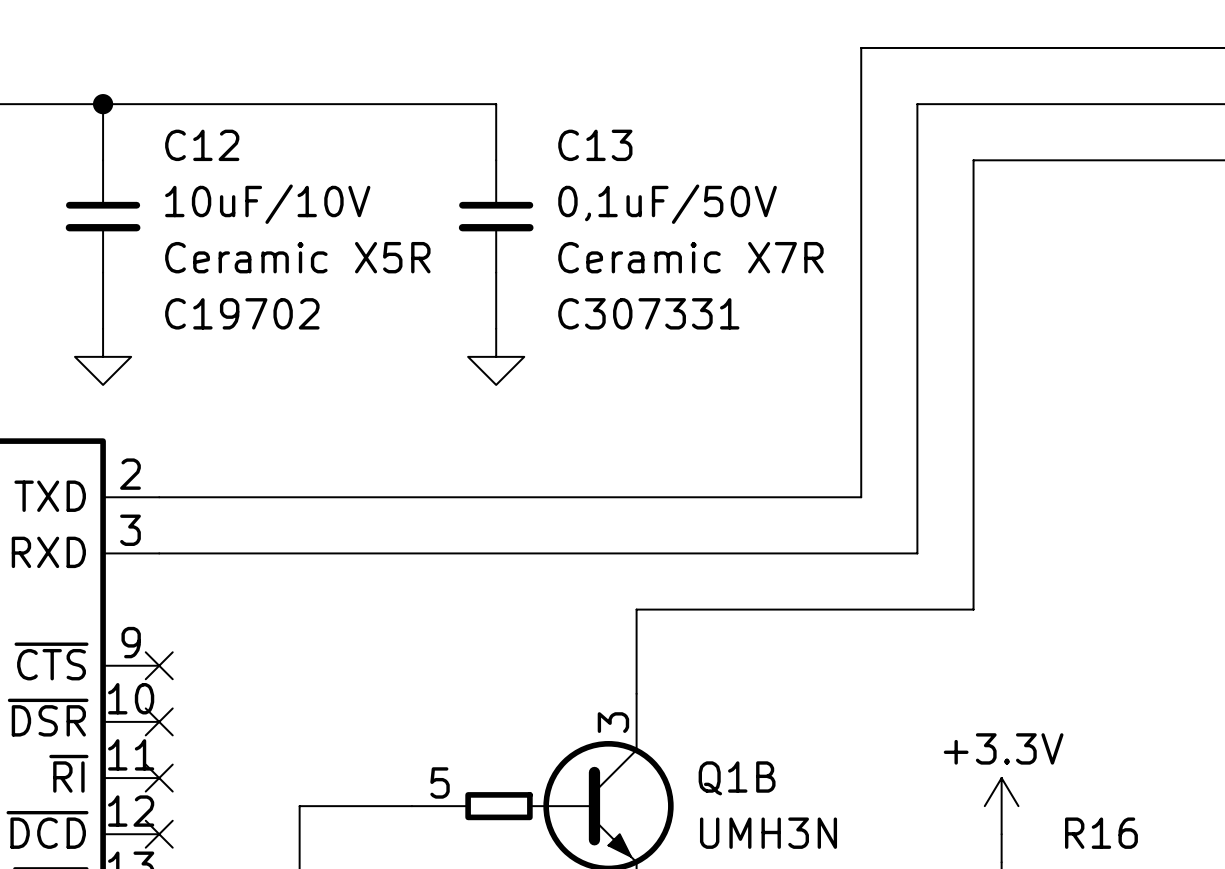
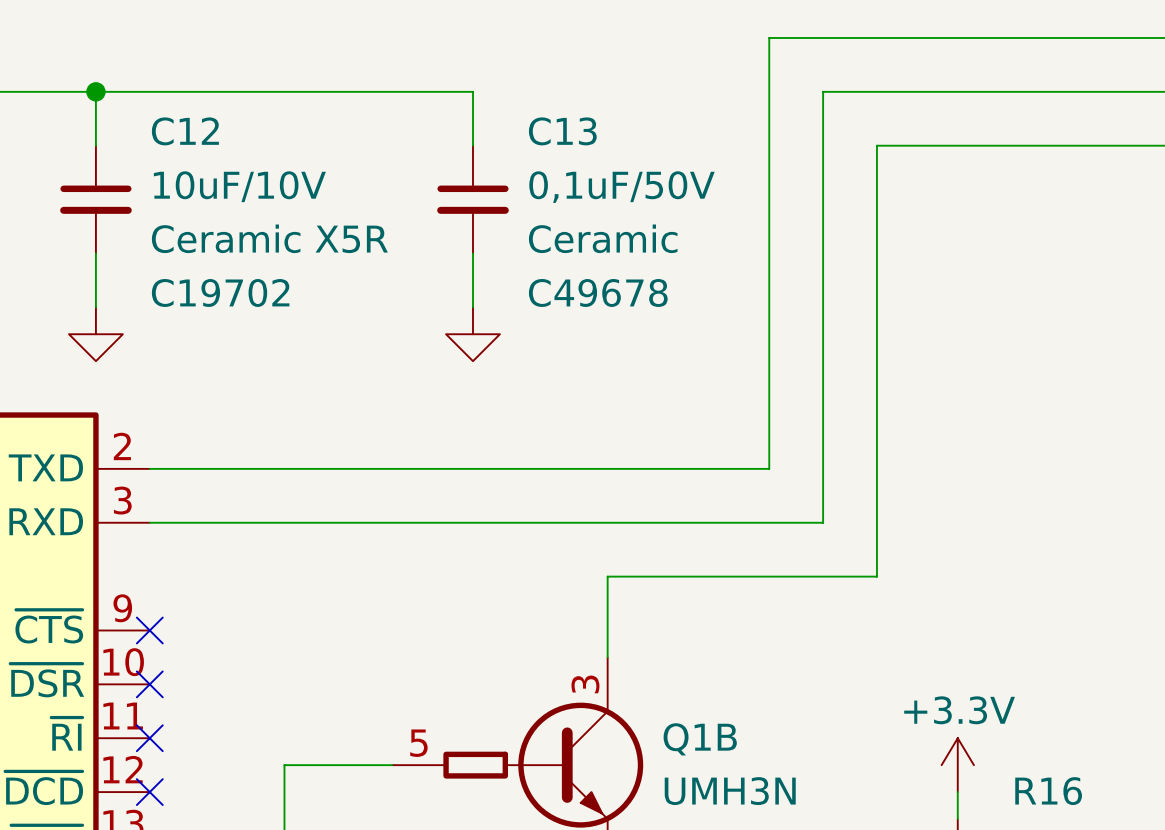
wire: (861, 47) (861, 104) -> (876, 91) (823, 91)
wire: none -> (823, 37) (769, 37) (769, 468)
wire: (917, 104) (917, 160) -> (930, 145) (876, 145)
wire: (973, 160) (973, 609) (917, 609) -> none
C13 text: Ceramic X7R (690, 257) -> Ceramic (603, 238)
C13 text: C307331 (648, 313) -> C49678 (598, 292)
wire: (805, 497) (861, 497) -> (823, 522) (823, 468)
wire: (861, 553) (917, 553) -> (876, 576) (876, 522)

